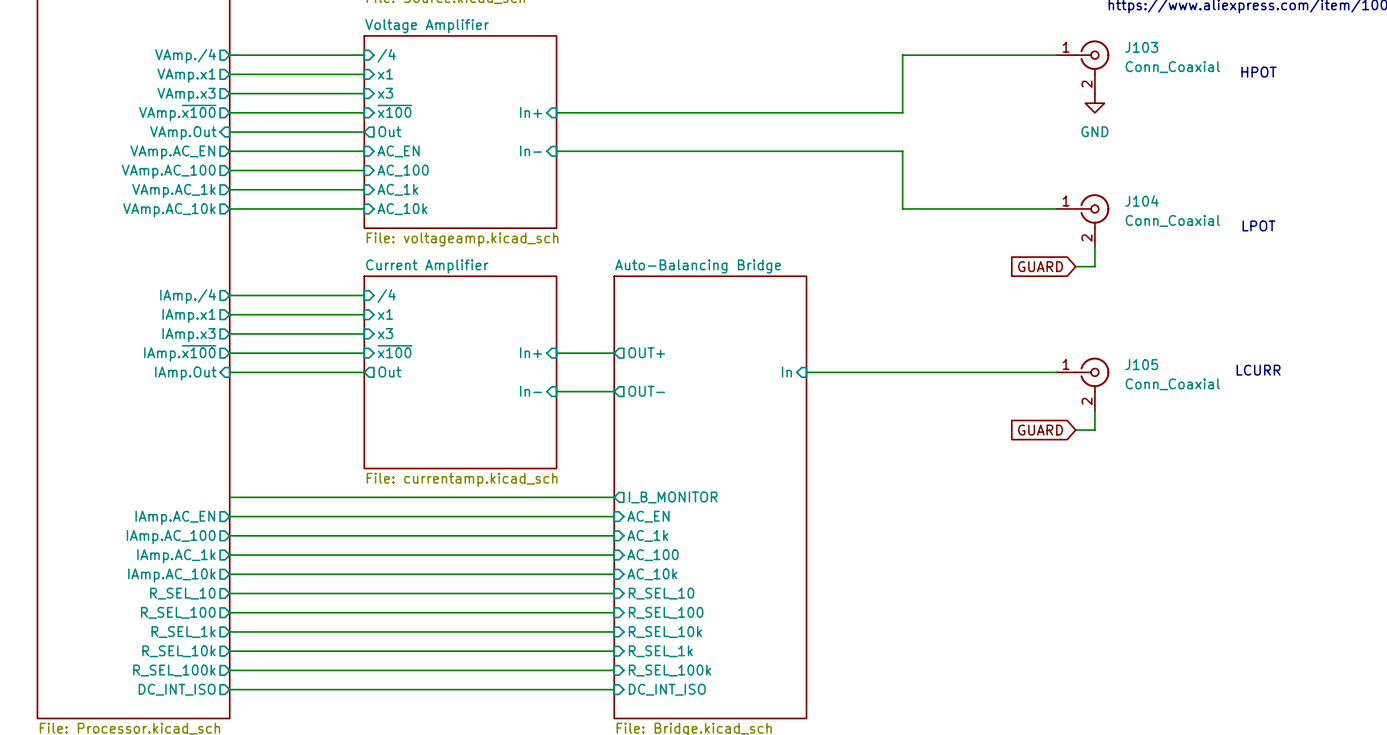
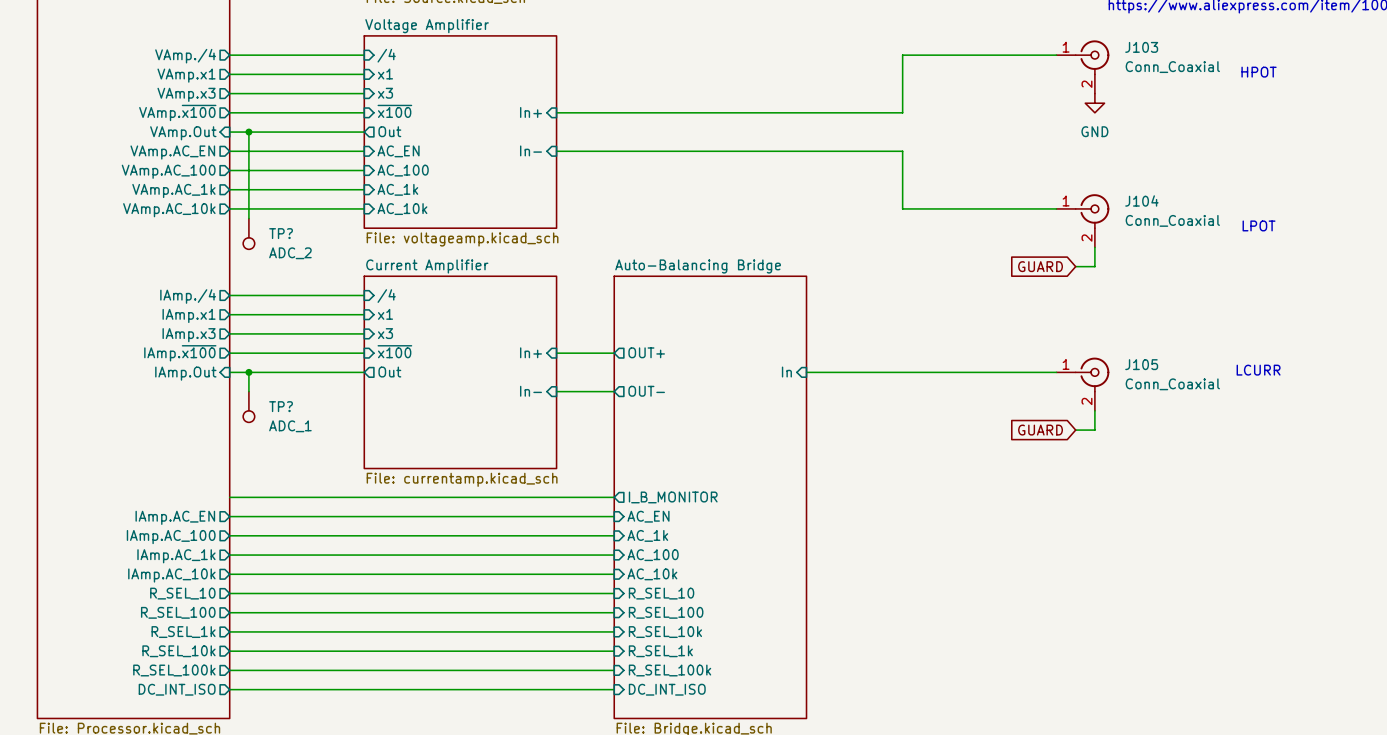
wire: none -> (248, 132) (248, 218)
junction: none -> (248, 132)
TP?: none -> ADC_2 (248, 233)
wire: none -> (248, 372) (248, 391)
junction: none -> (248, 372)
TP?: none -> ADC_1 (248, 407)

